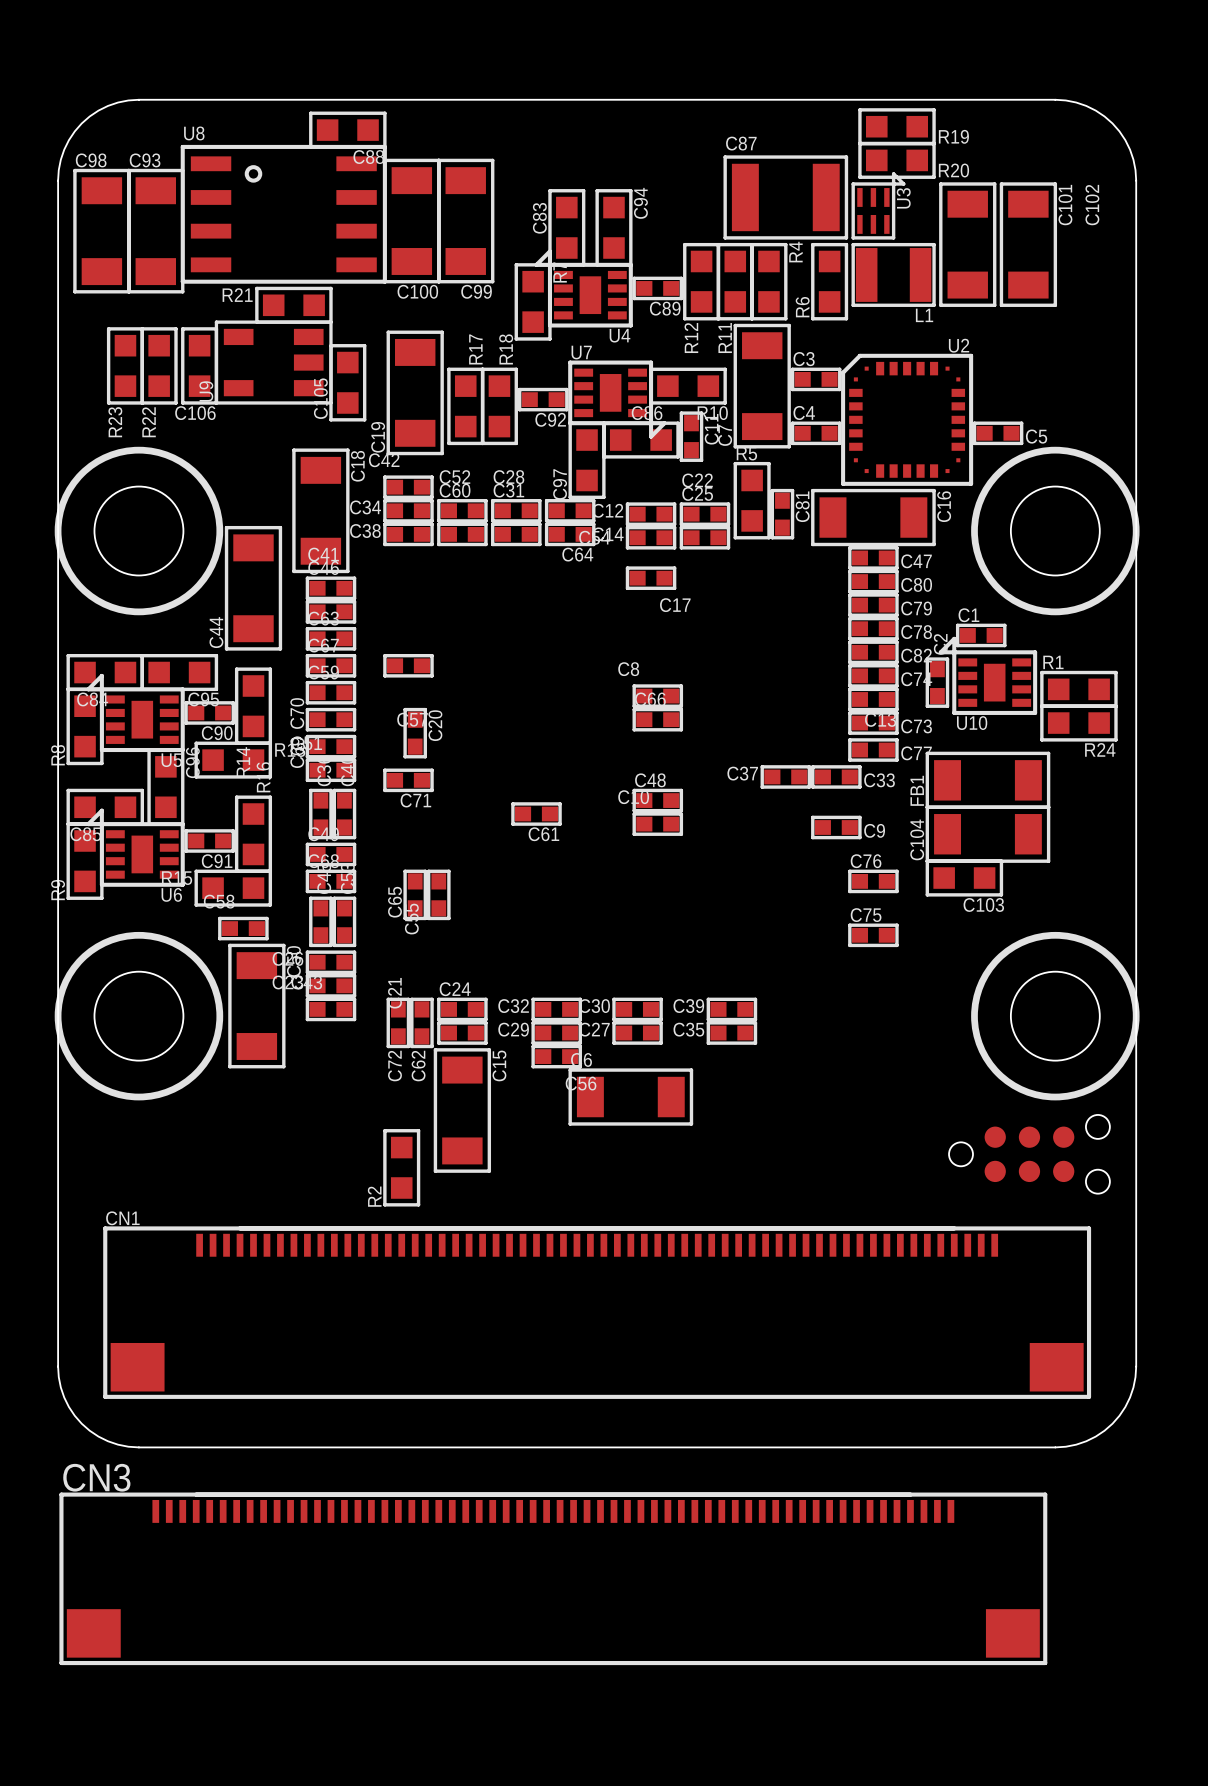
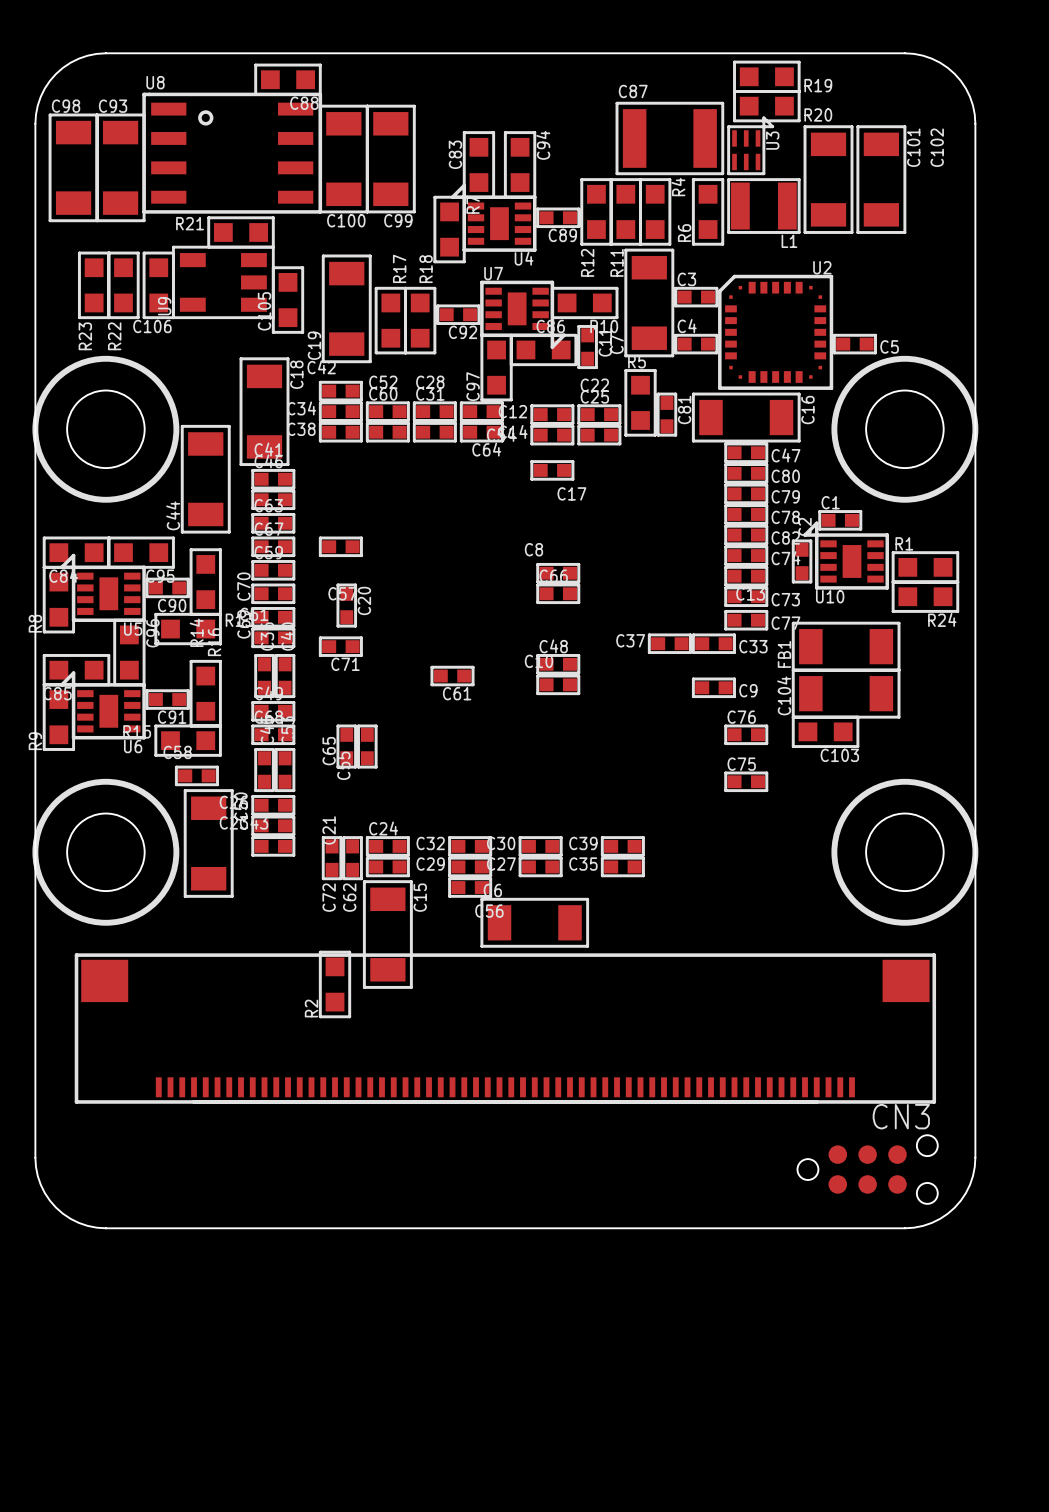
part position: (1029, 1154) -> (867, 1169)
CN1: (597, 1312) -> none
CN3 rotation: 0° (553, 1578) -> 180° (505, 1028)

